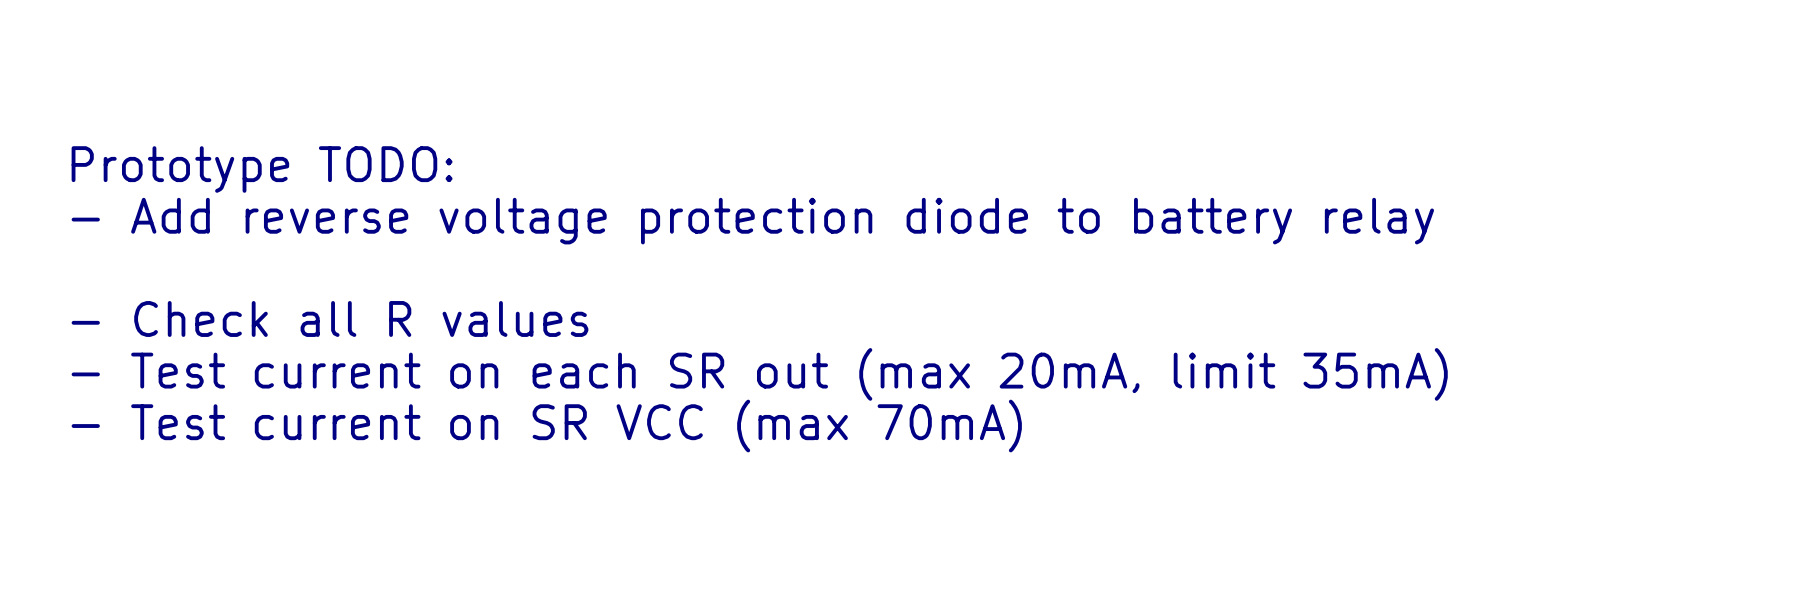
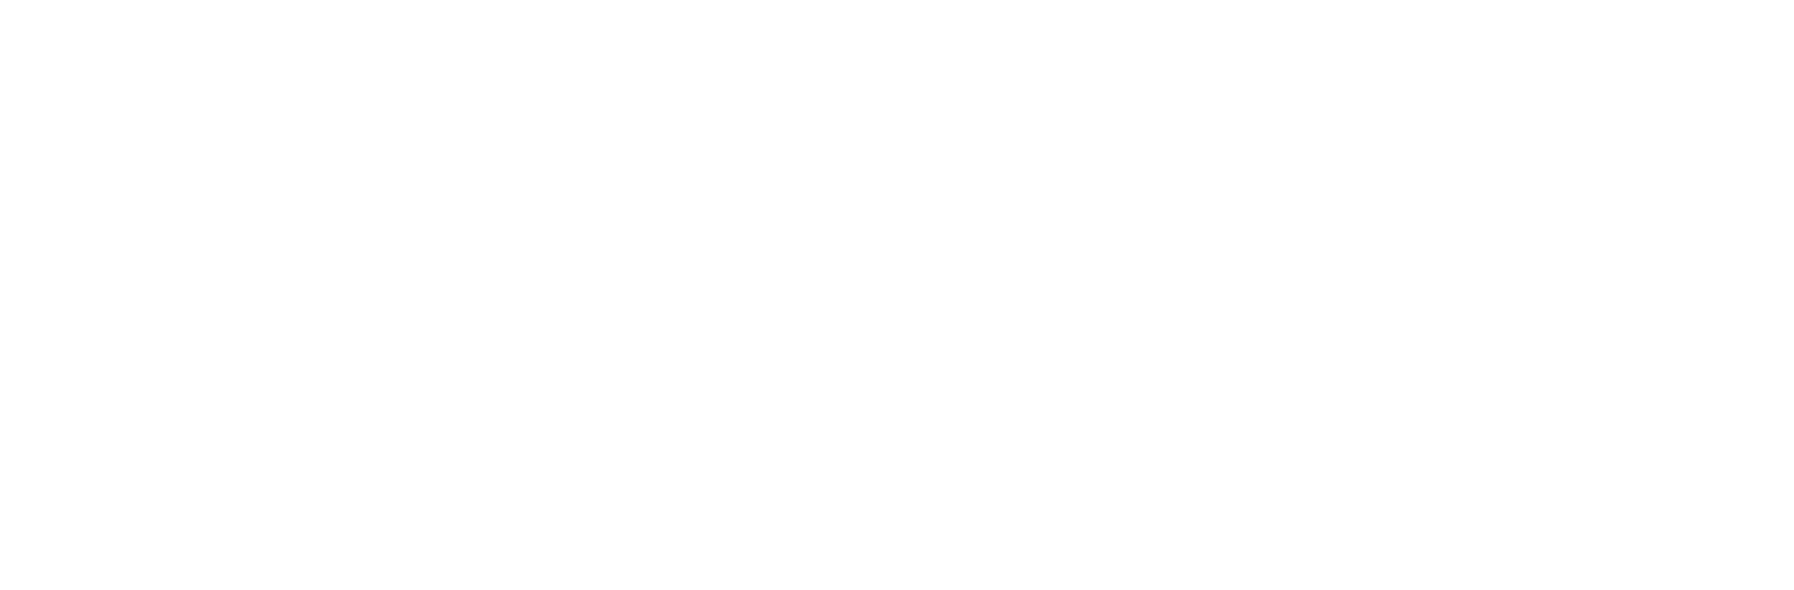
text: Prototype TODO: (262, 169) -> none
text: - Add reverse voltage protection diode to battery relay (752, 221) -> none
text: - Check all R values (329, 318) -> none
text: - Test current on each SR out (max 20mA, limit 35mA) (759, 374) -> none
text: - Test current on SR VCC (max 70mA) (546, 426) -> none

